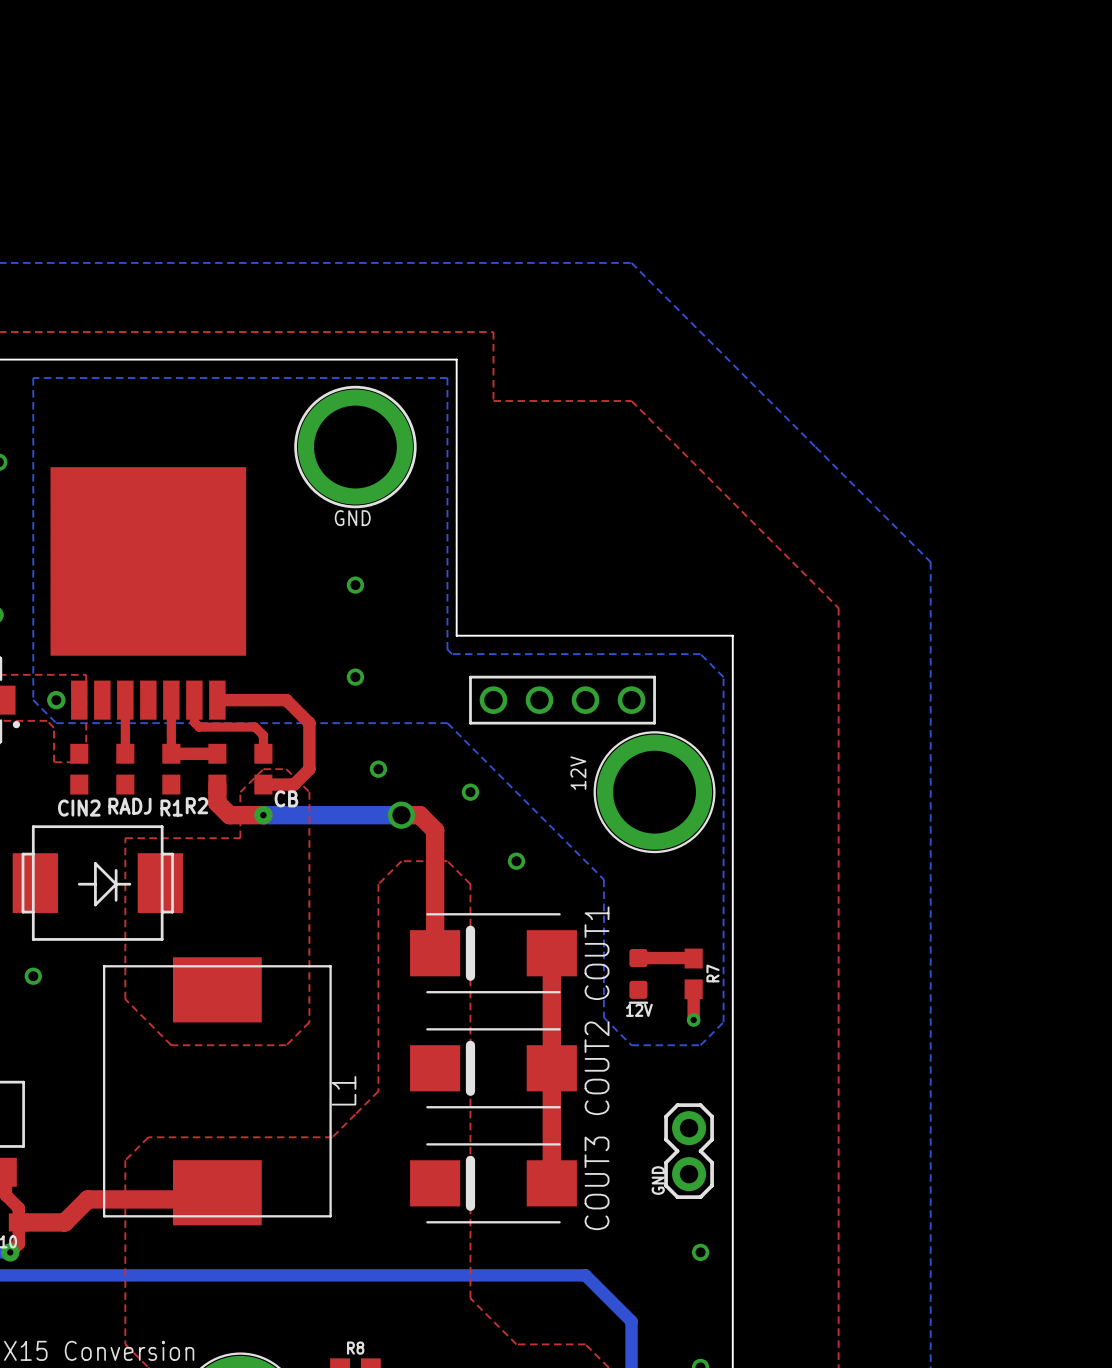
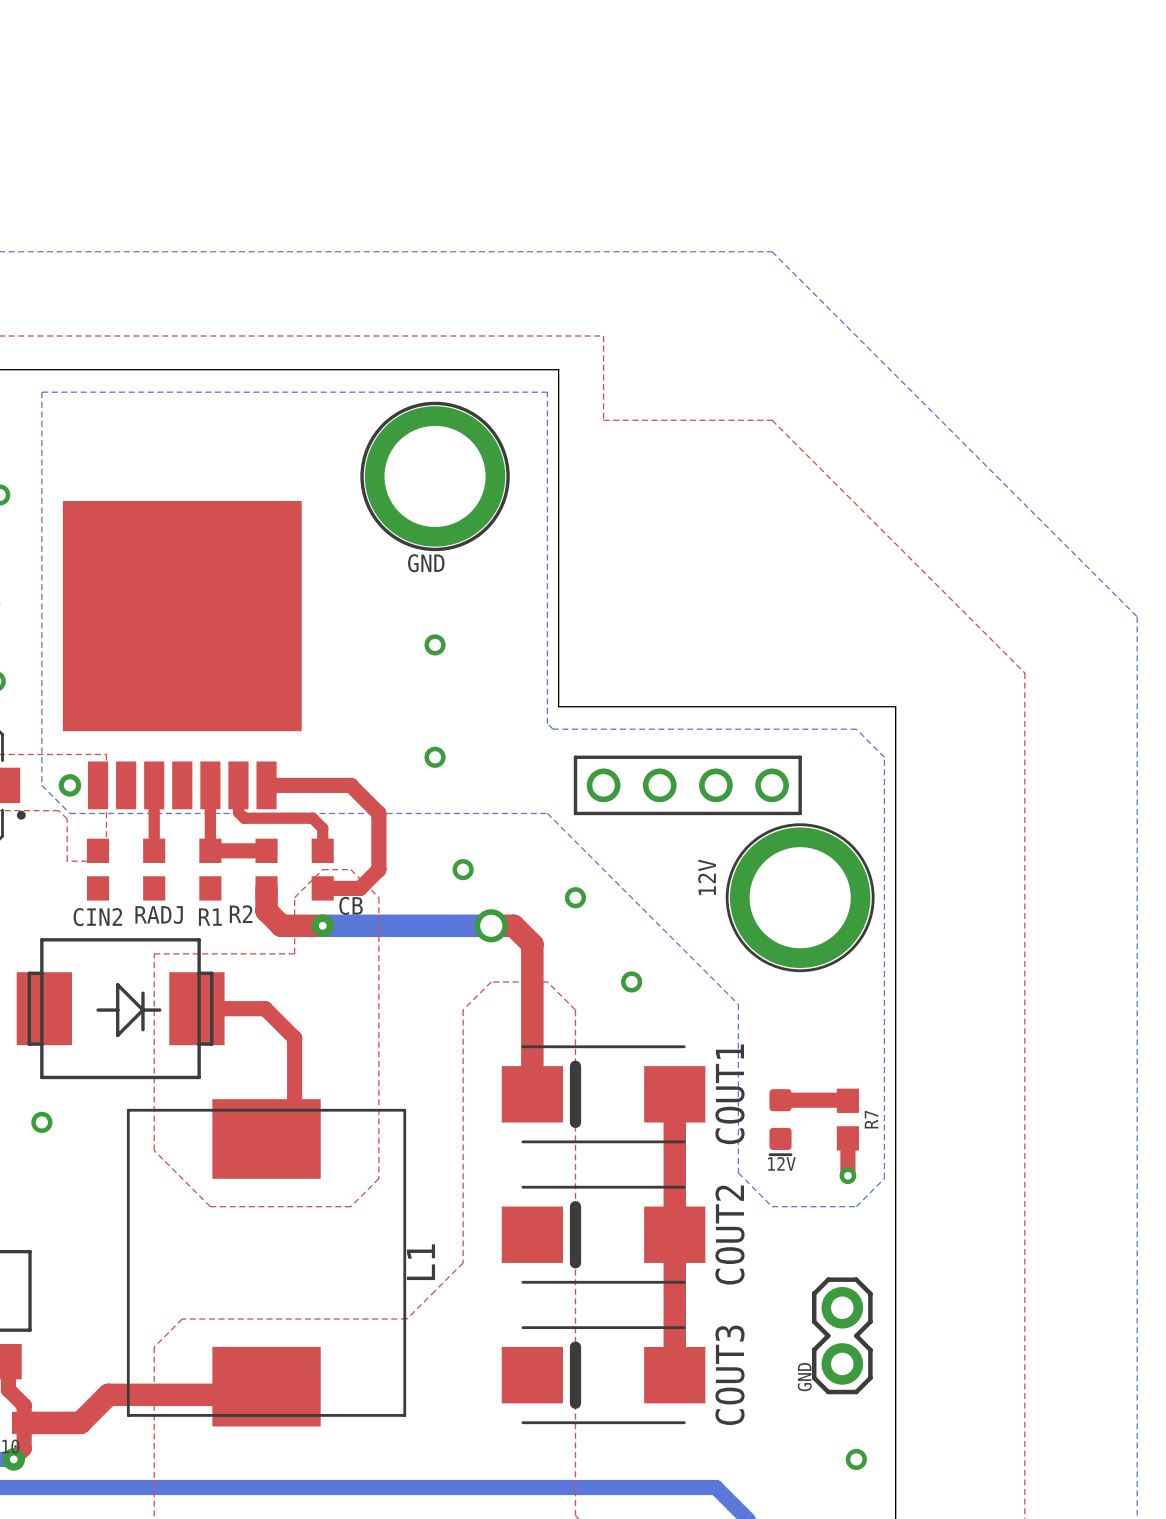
top track: none -> (196, 1008) (265, 1008) (294, 1038) (294, 1110) (266, 1138)

